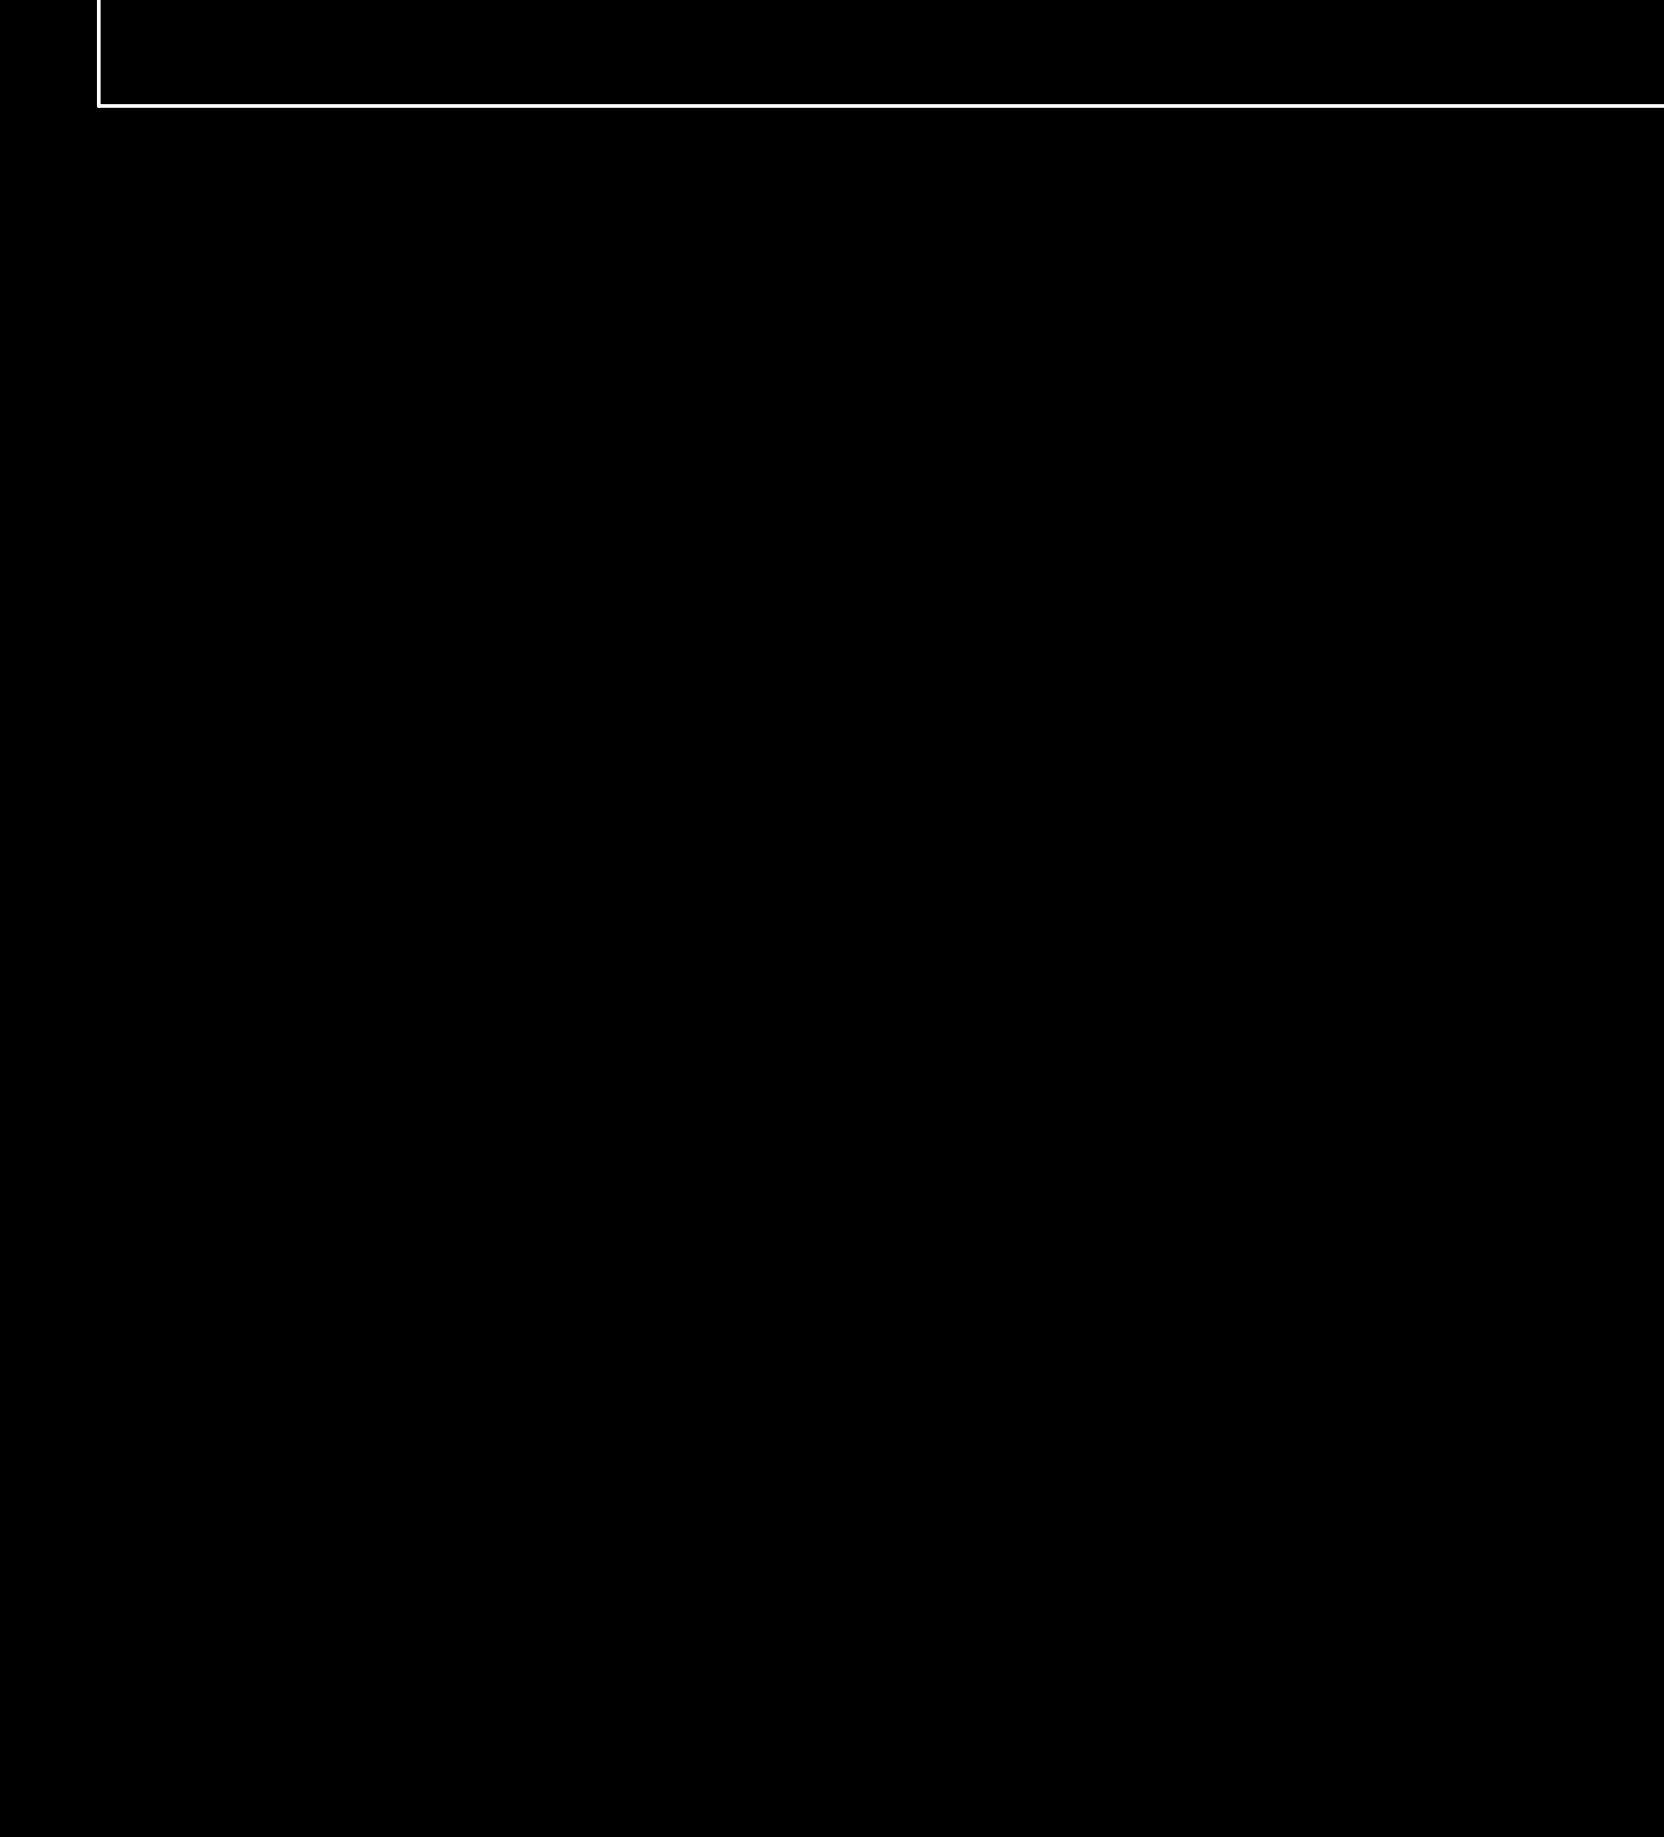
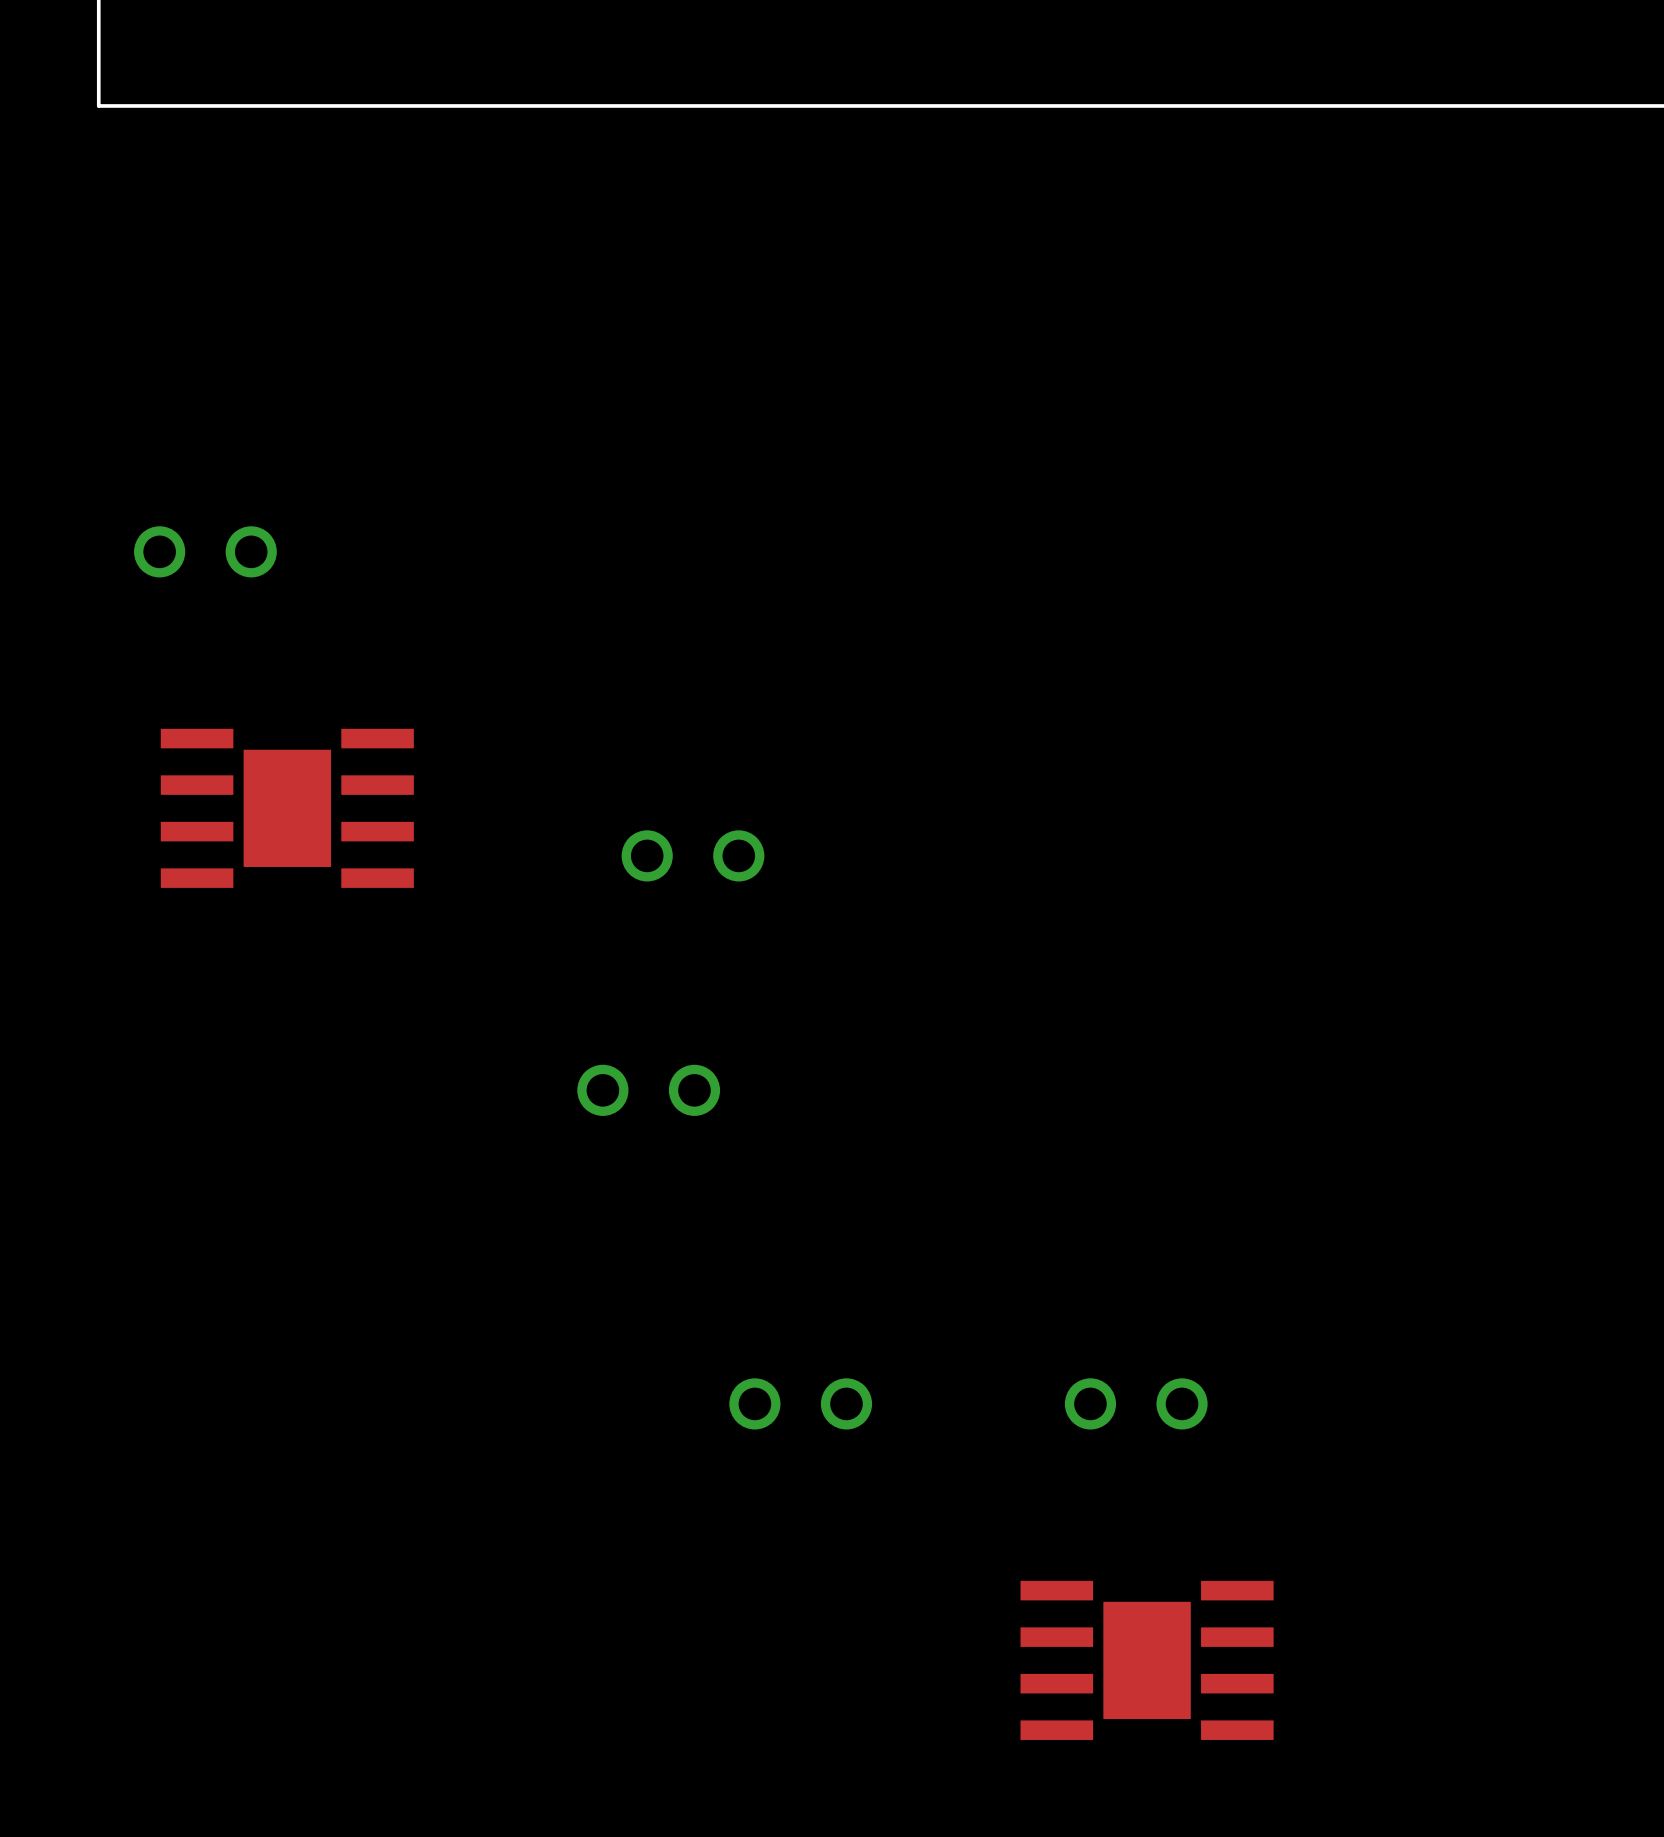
part: none -> (205, 551)
part: none -> (287, 808)
part: none -> (693, 855)
part: none -> (648, 1090)
part: none -> (800, 1403)
part: none -> (1136, 1403)
part: none -> (1147, 1660)

